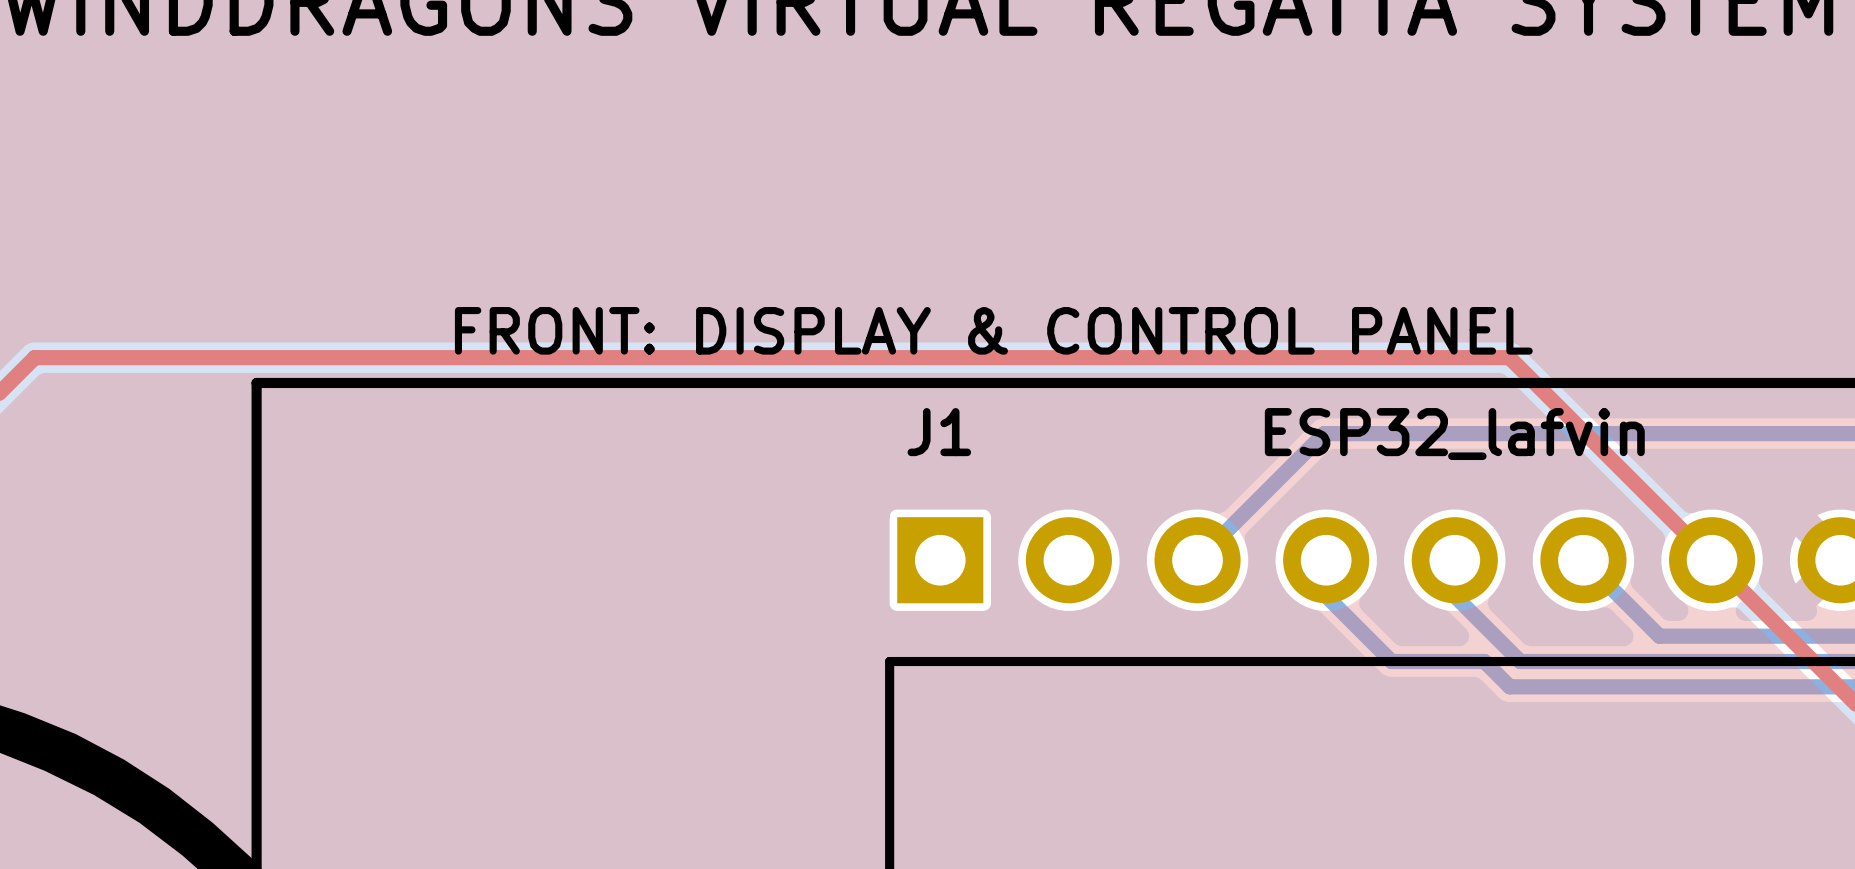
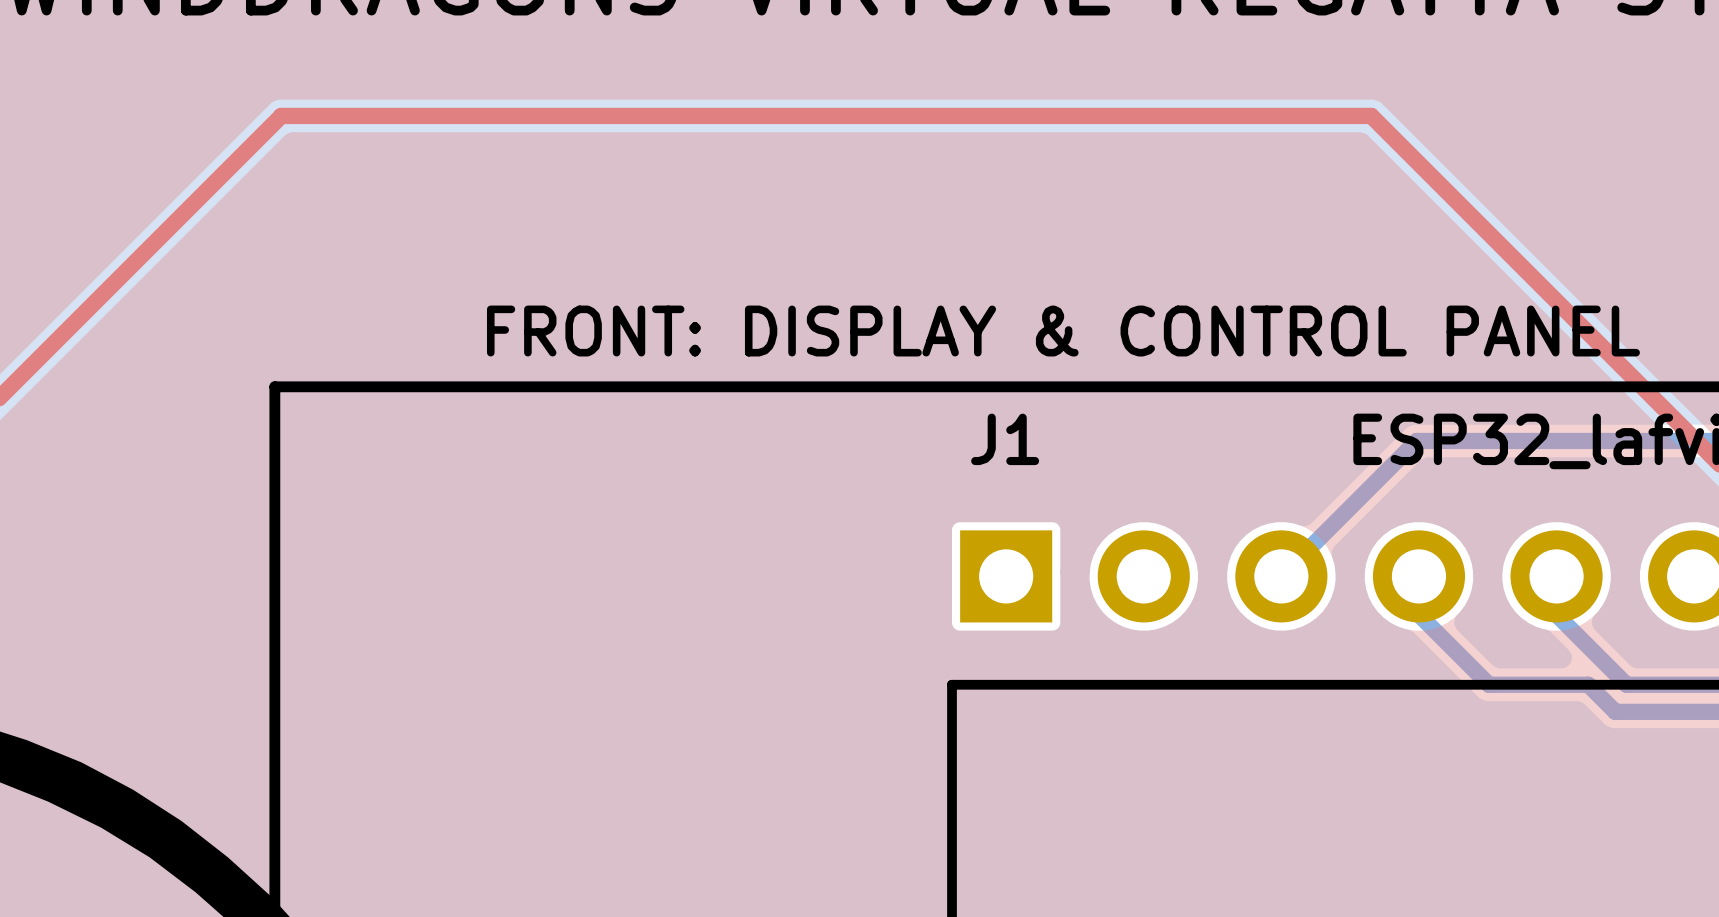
top track: (34, 357) (1509, 357) -> (37, 359) (281, 115) (1371, 115) (1615, 359)

